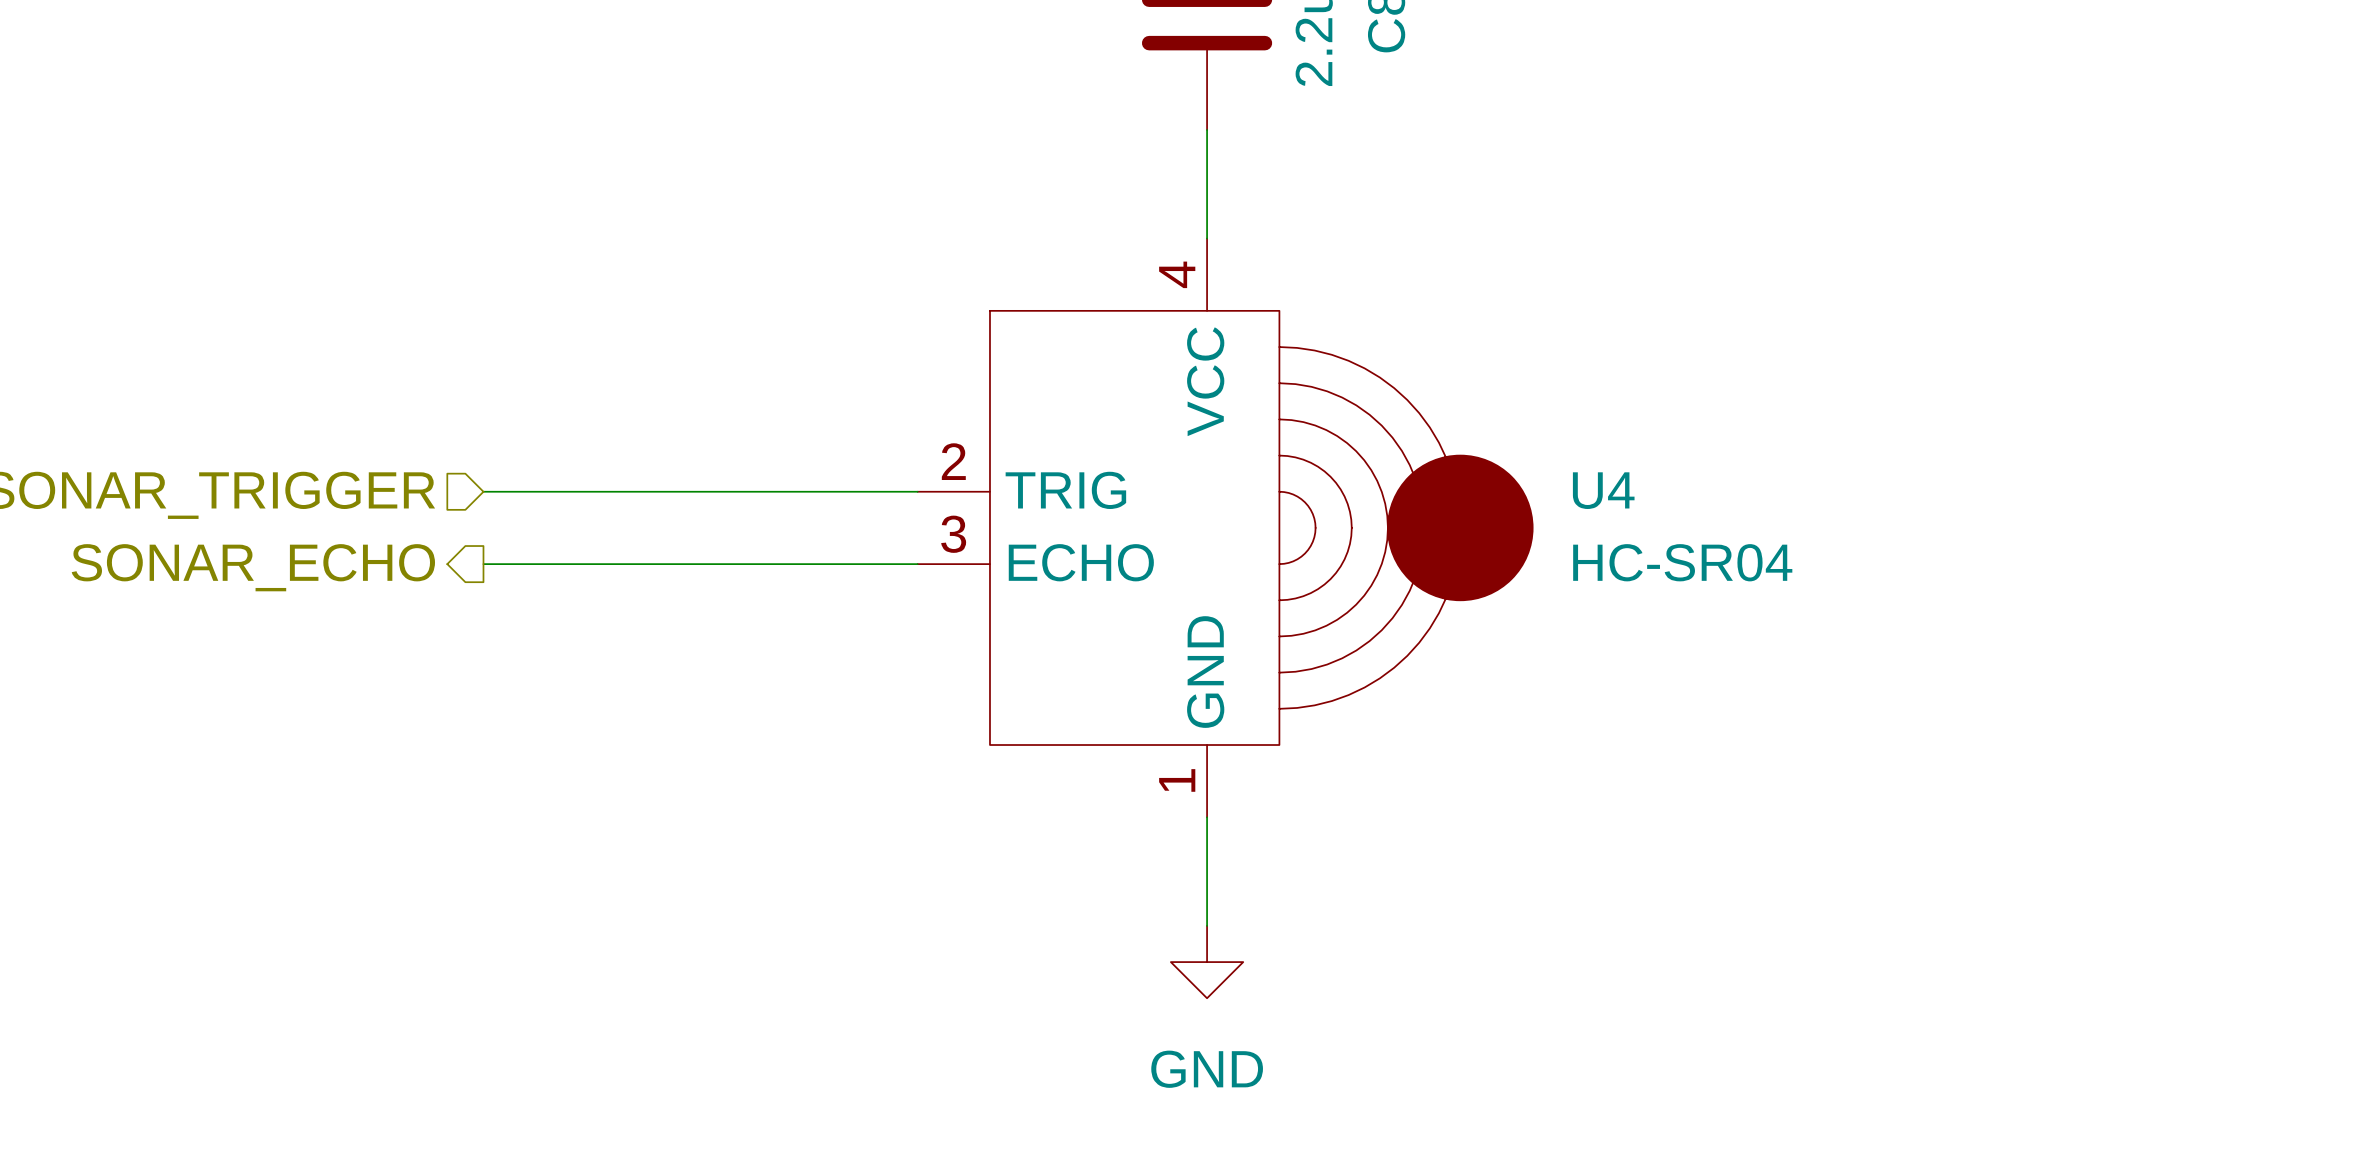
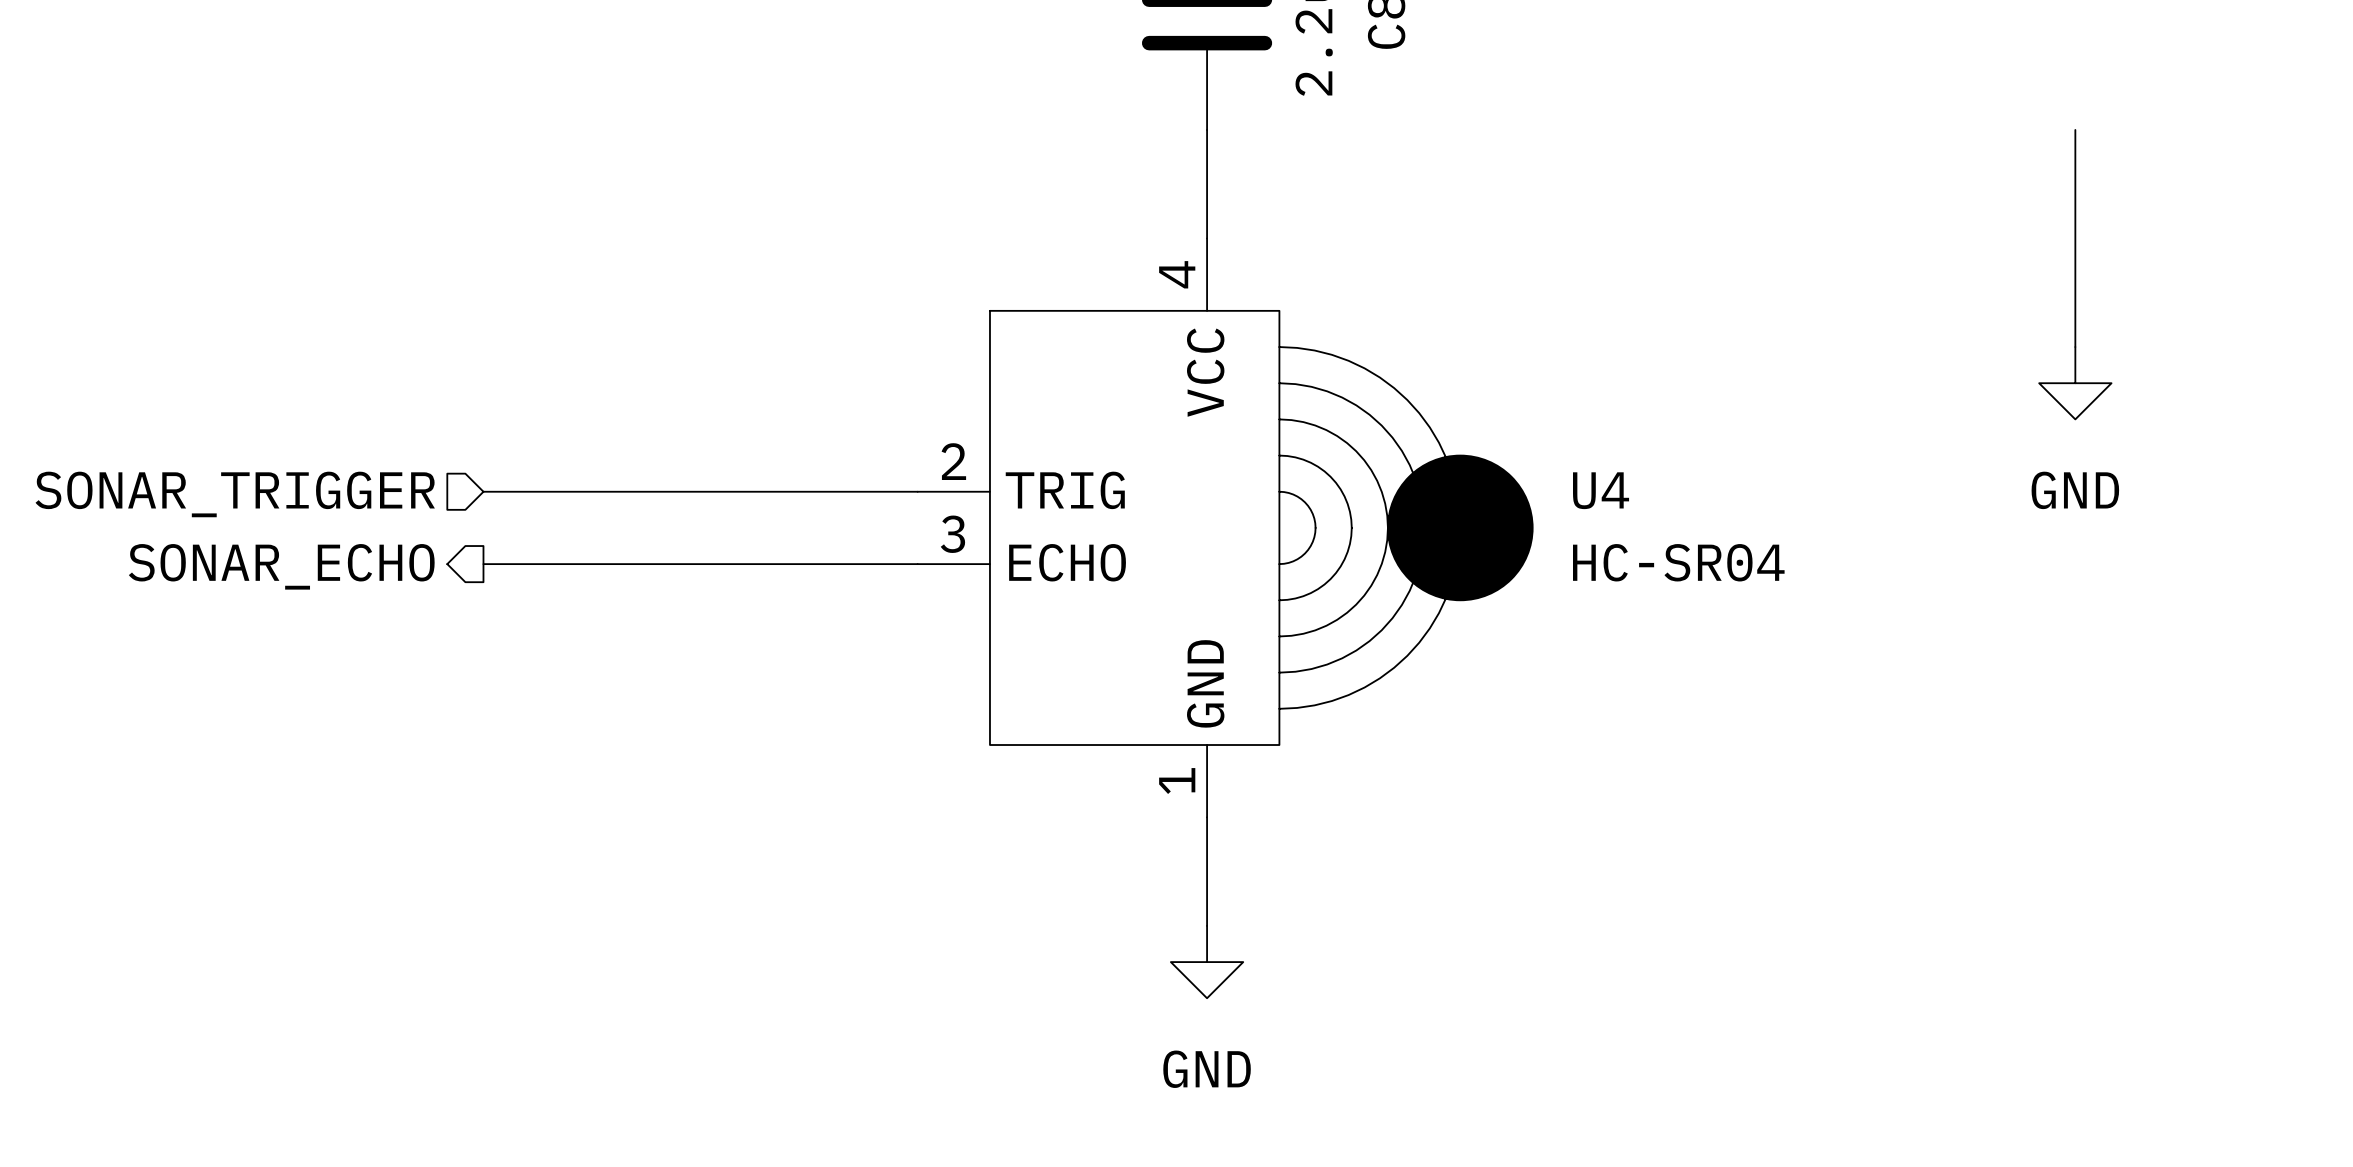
wire: none -> (2075, 129) (2075, 347)
power symbol: none -> GND (2075, 383)

